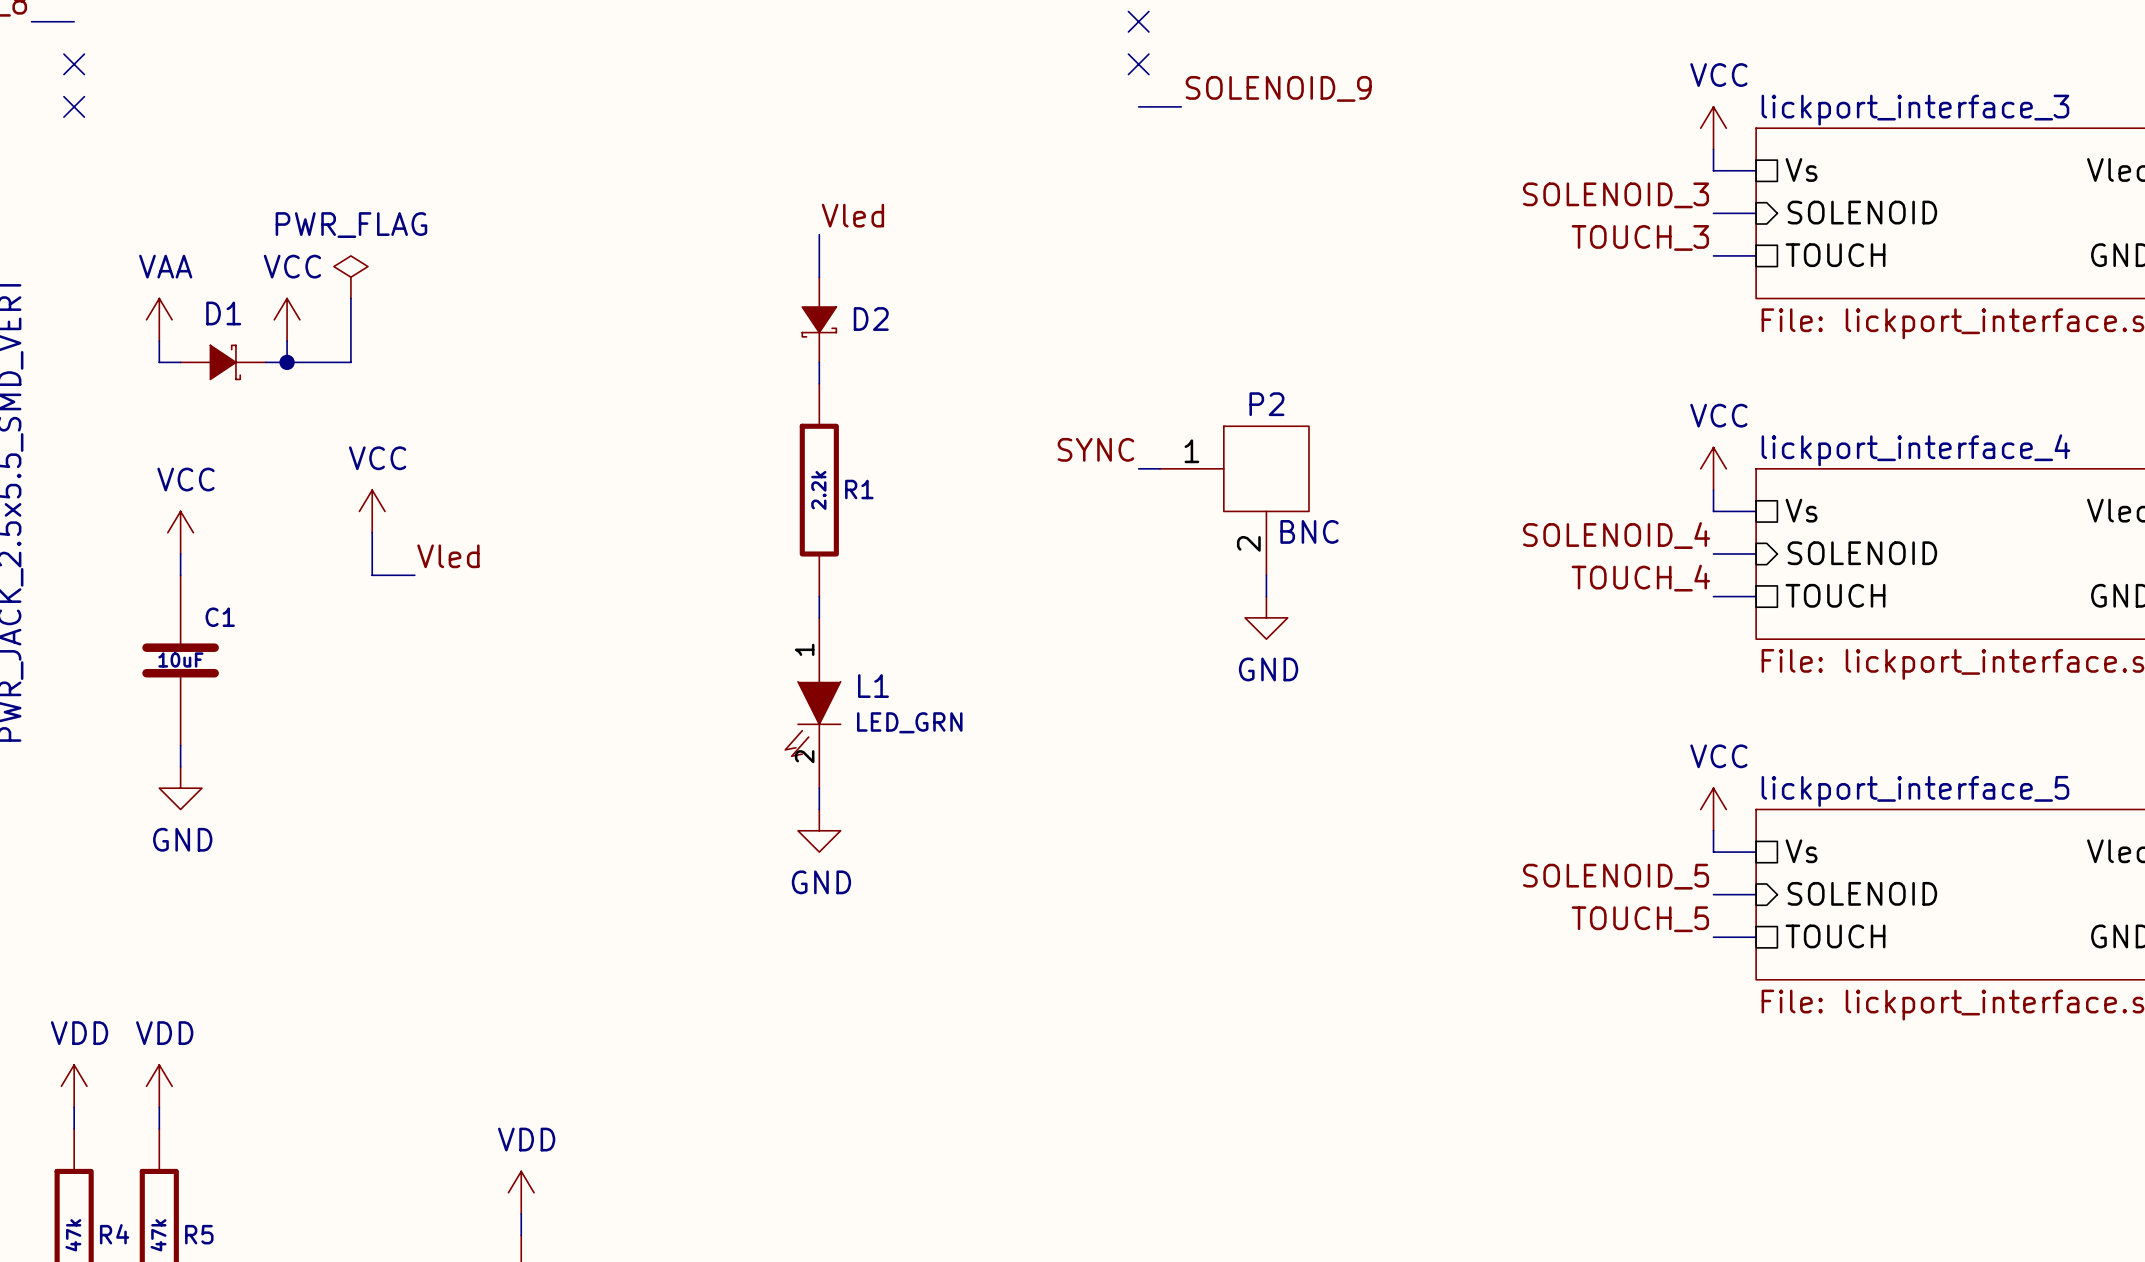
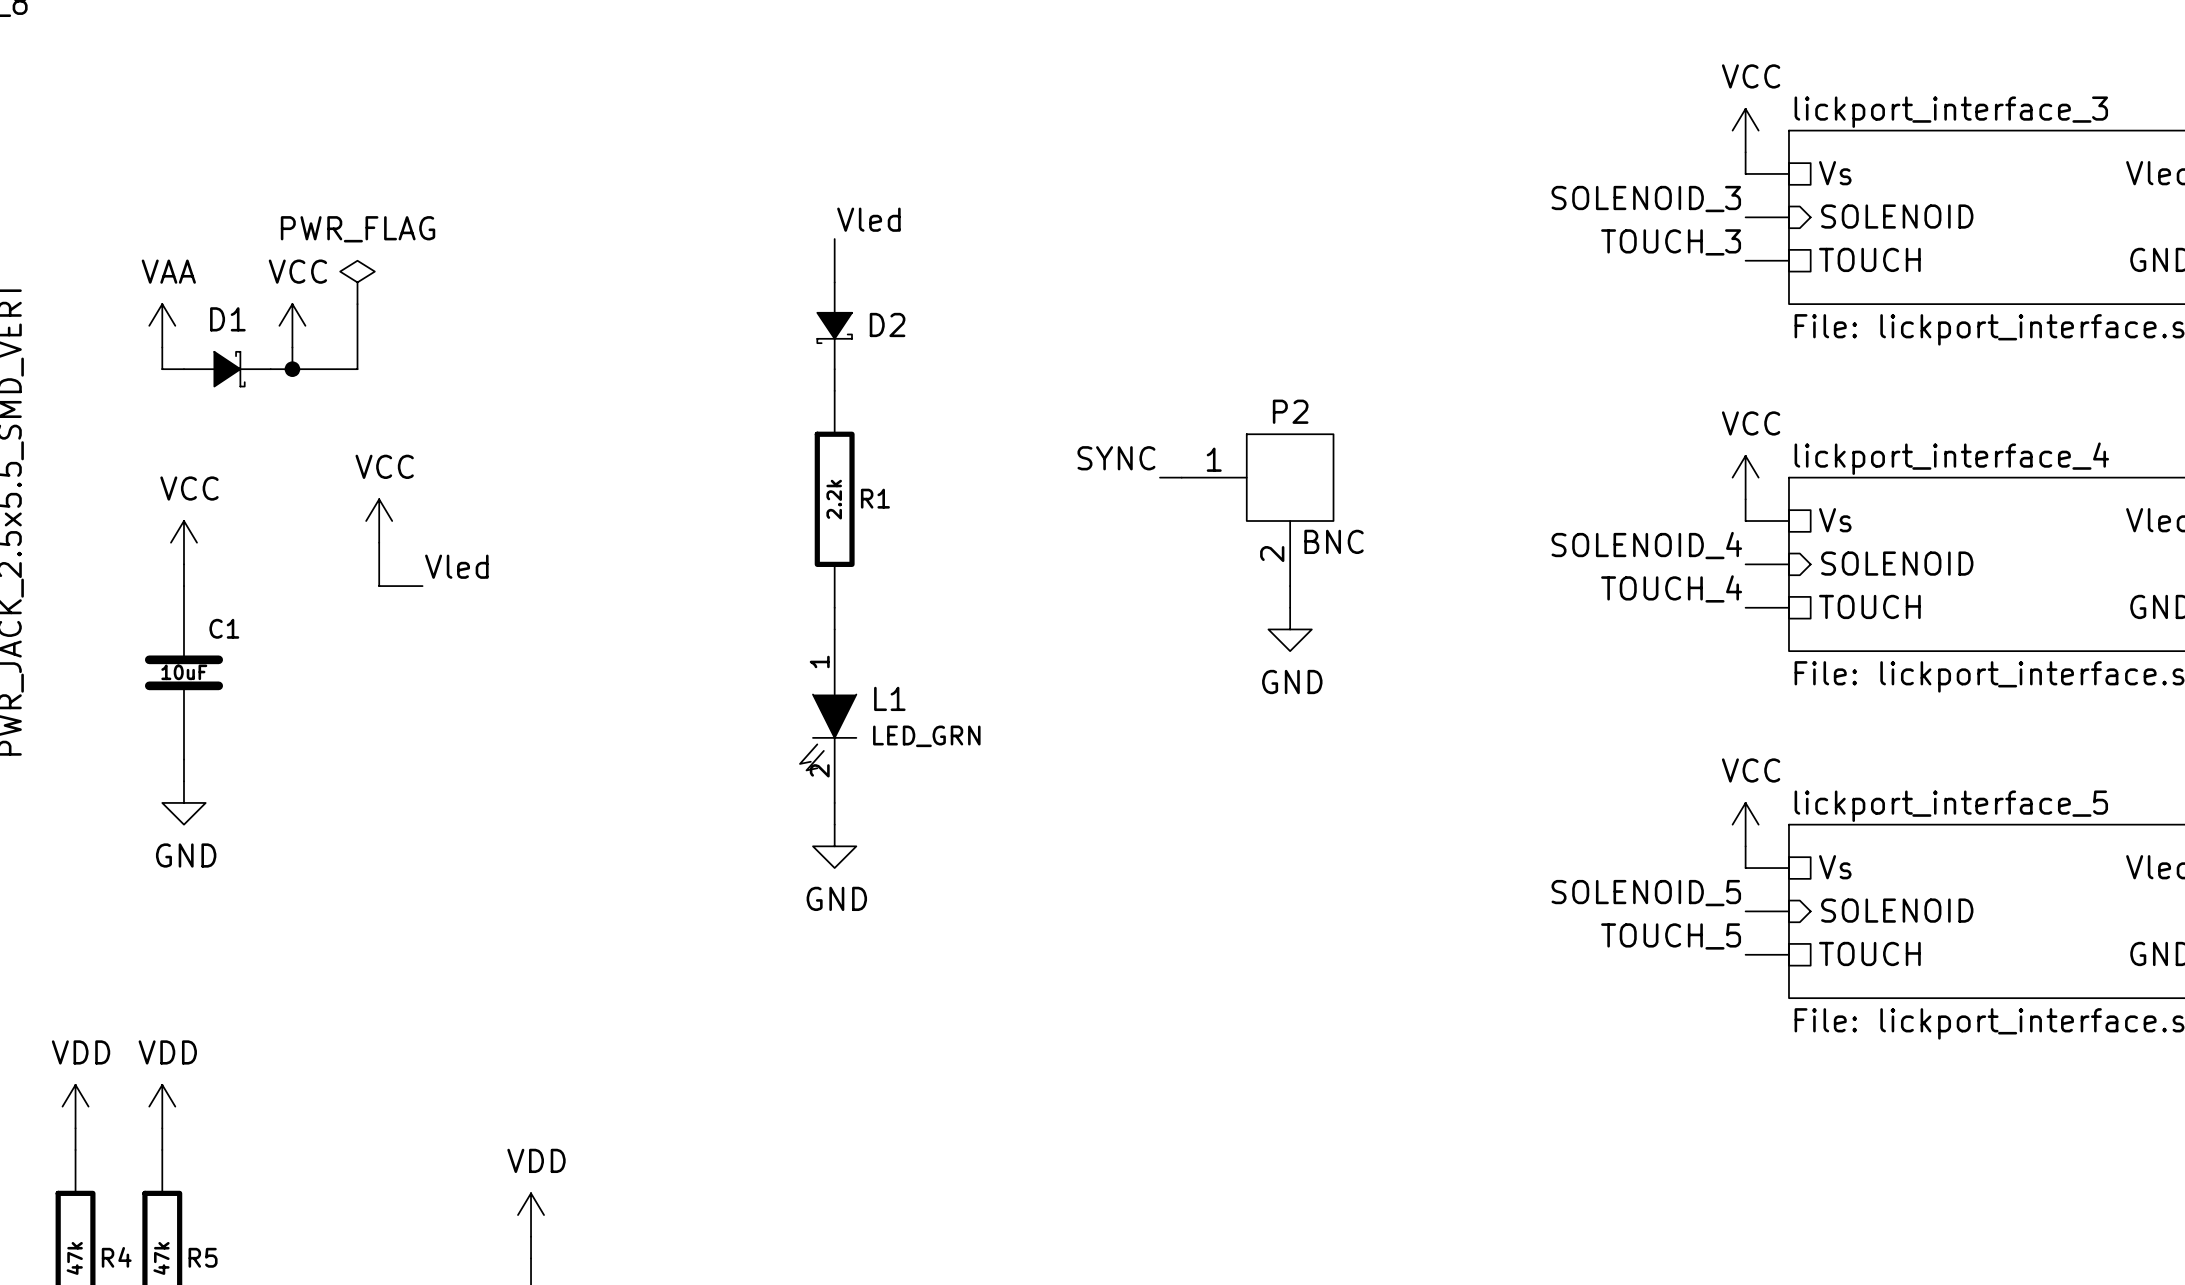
wire: (31, 21) (74, 21) -> none
no-connect mark: (1138, 21) -> none
no-connect mark: (74, 64) -> none
no-connect mark: (1138, 64) -> none
label: SOLENOID_9 (1278, 88) -> none
no-connect mark: (74, 106) -> none
wire: (1138, 106) (1181, 106) -> none

